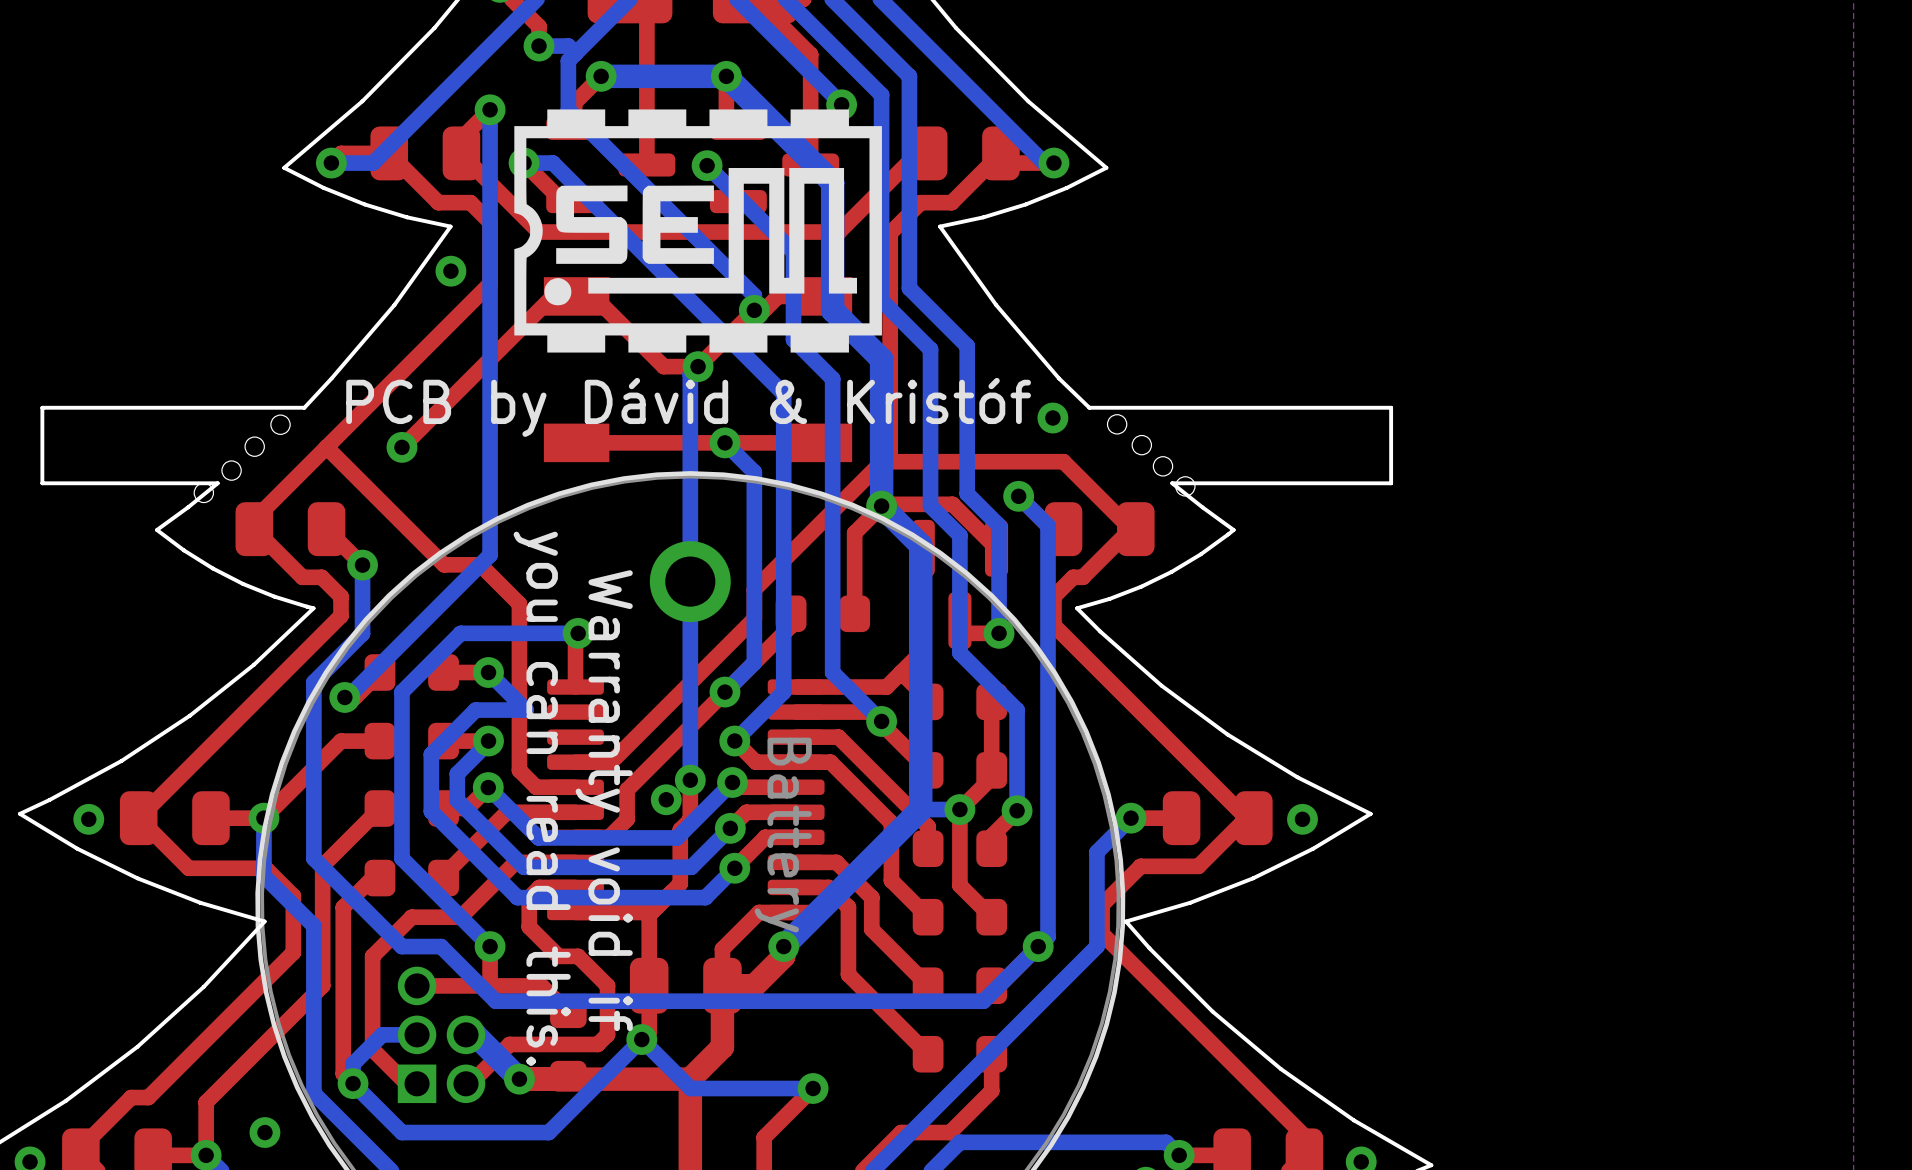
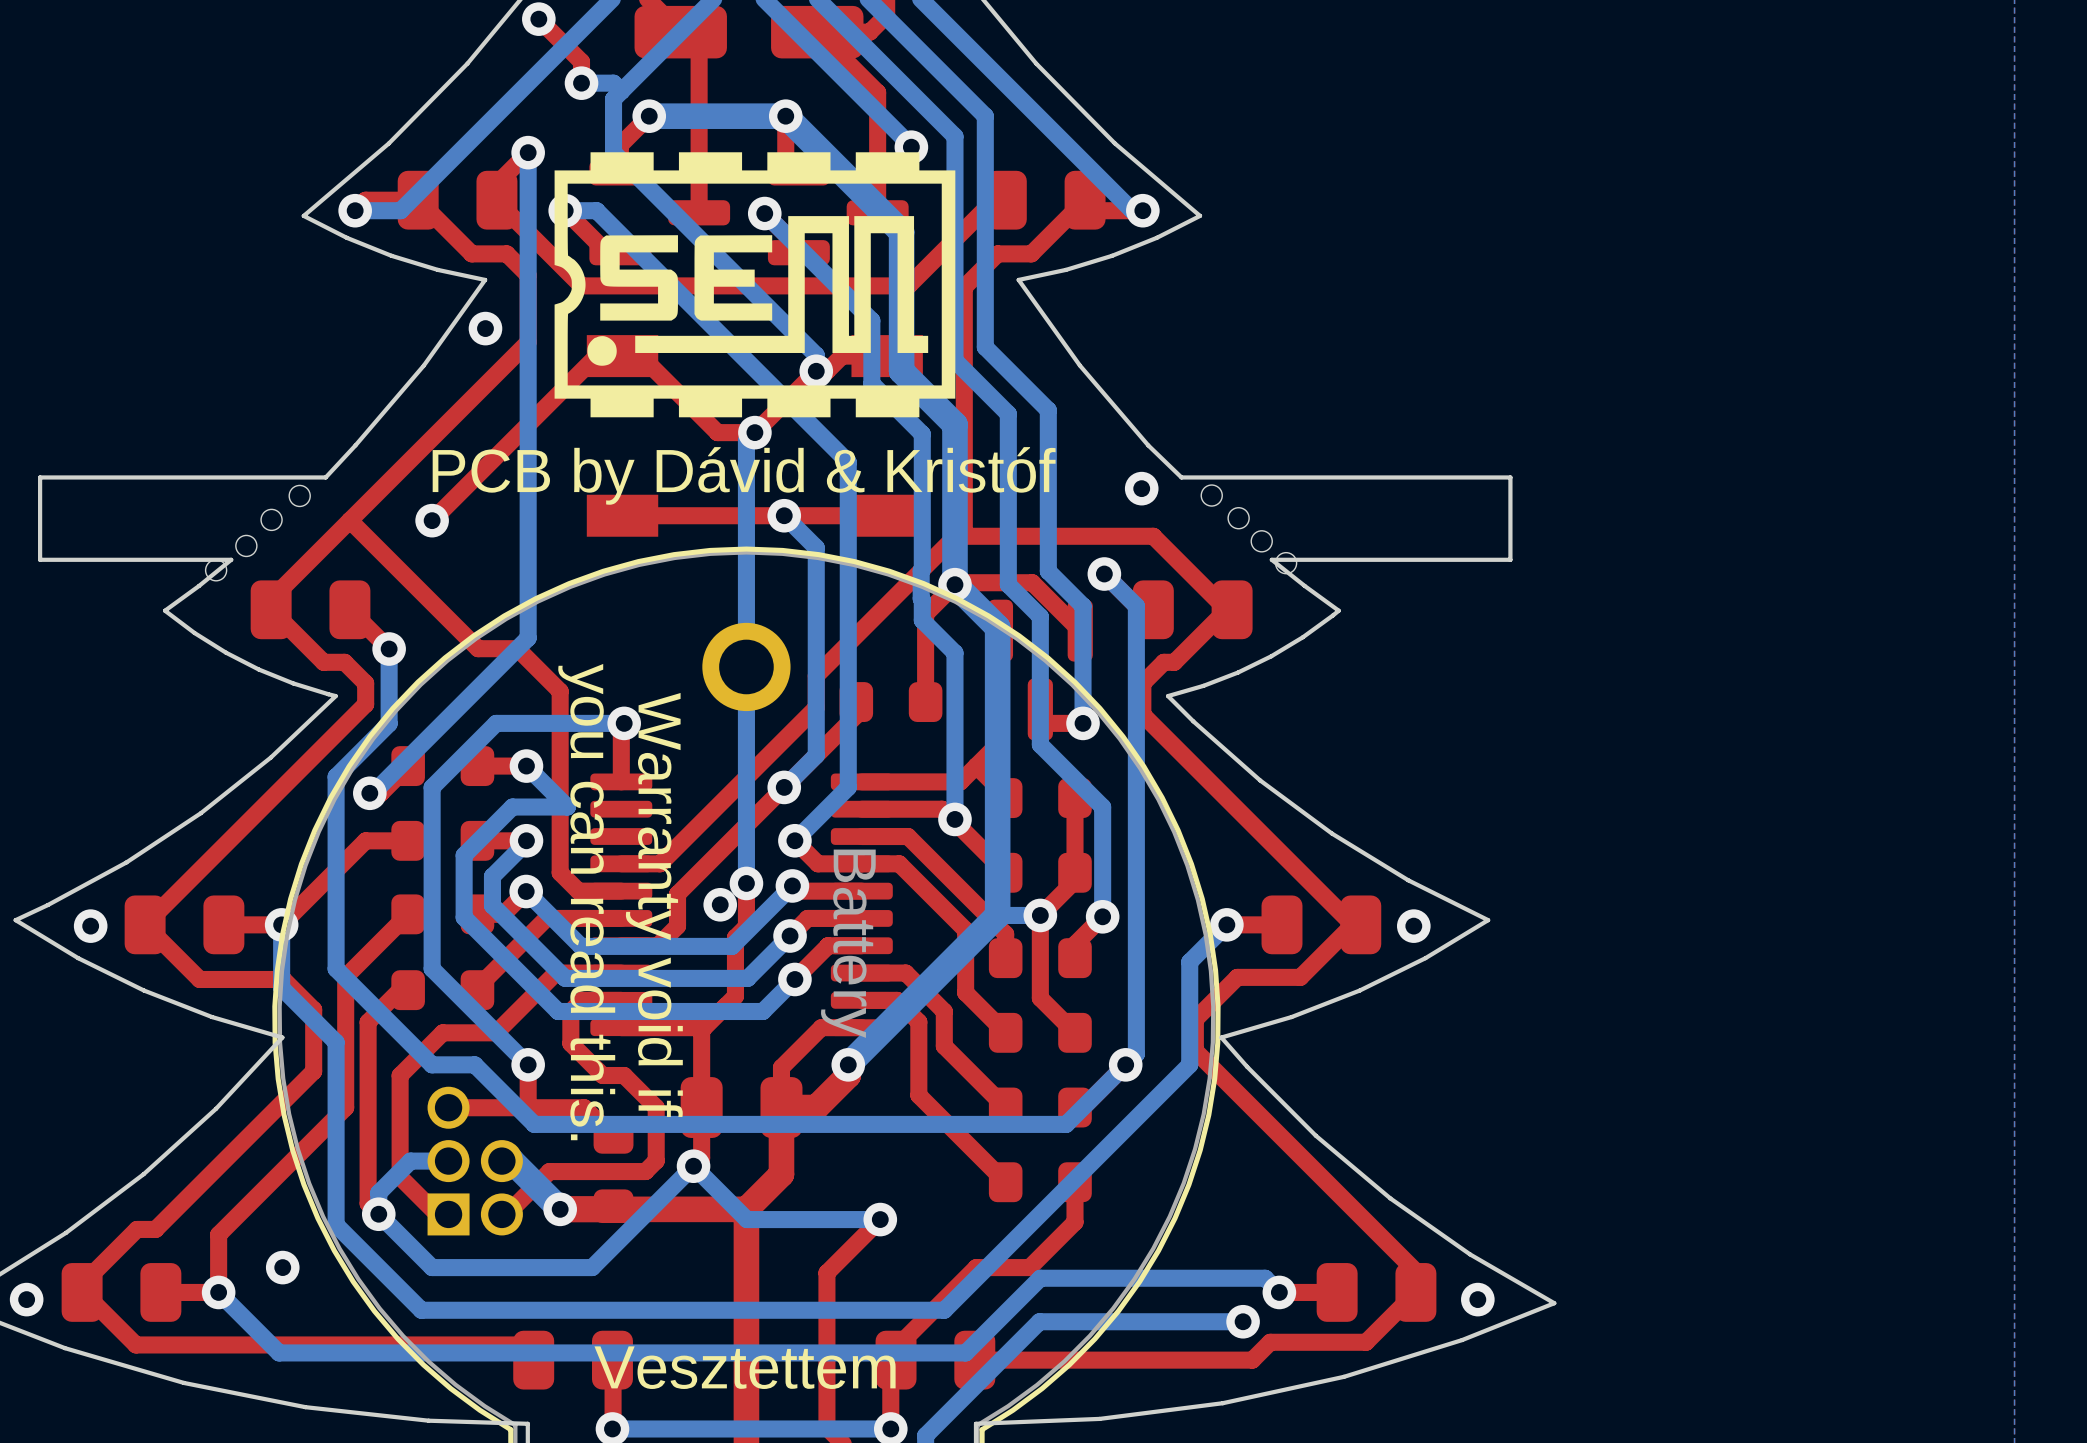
bottom track: (793, 252) (793, 339) (832, 378) (832, 672) (881, 721) -> (858, 307) (871, 320) (871, 383) (922, 434) (922, 620) (954, 652) (954, 819)

